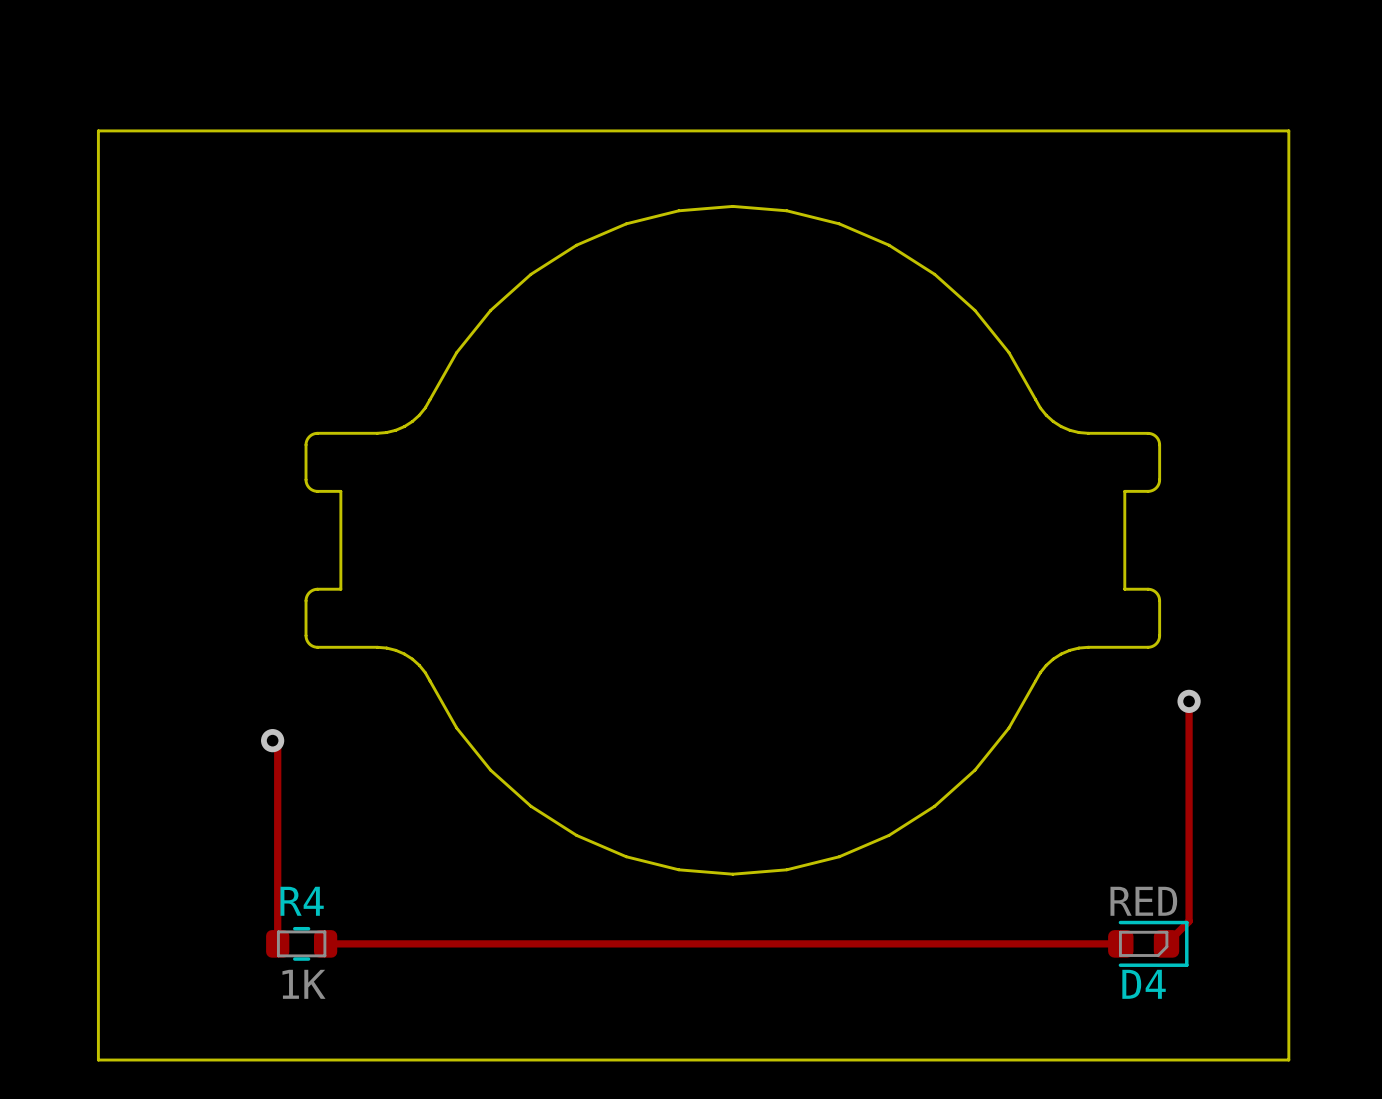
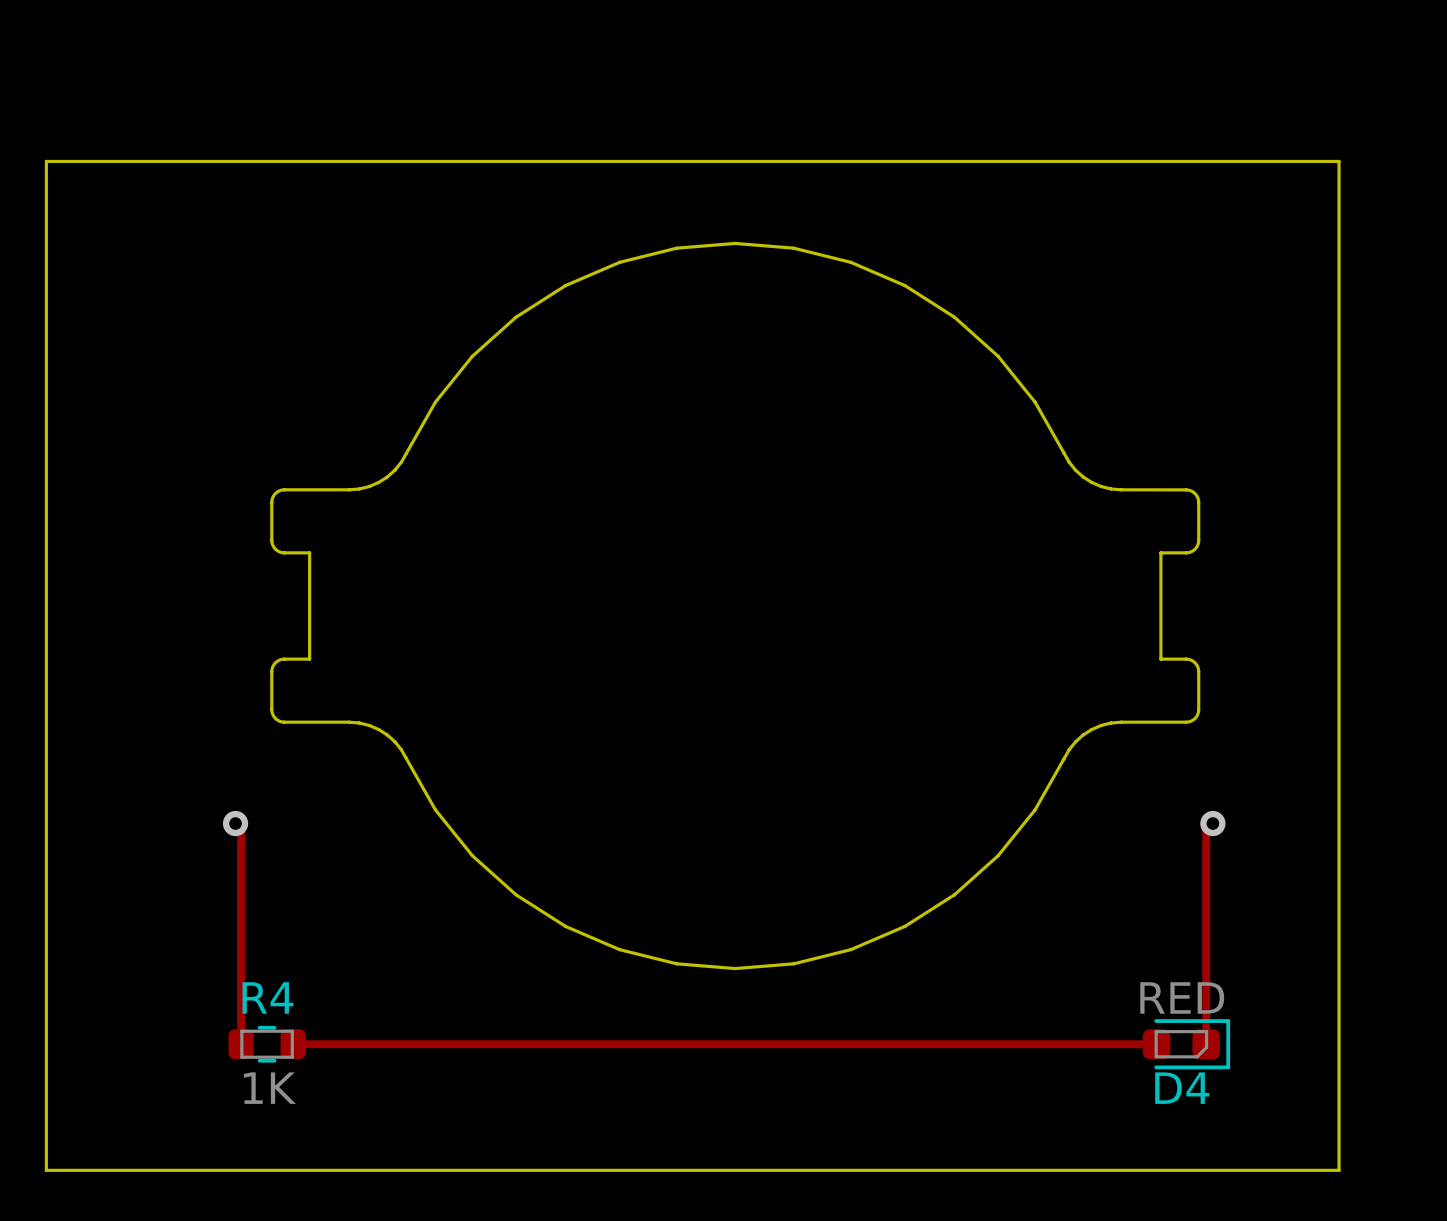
track: (1189, 701) (1189, 921) (1166, 943) -> (1212, 823) (1206, 830) (1206, 1044)
via position: (1189, 701) -> (1212, 823)

